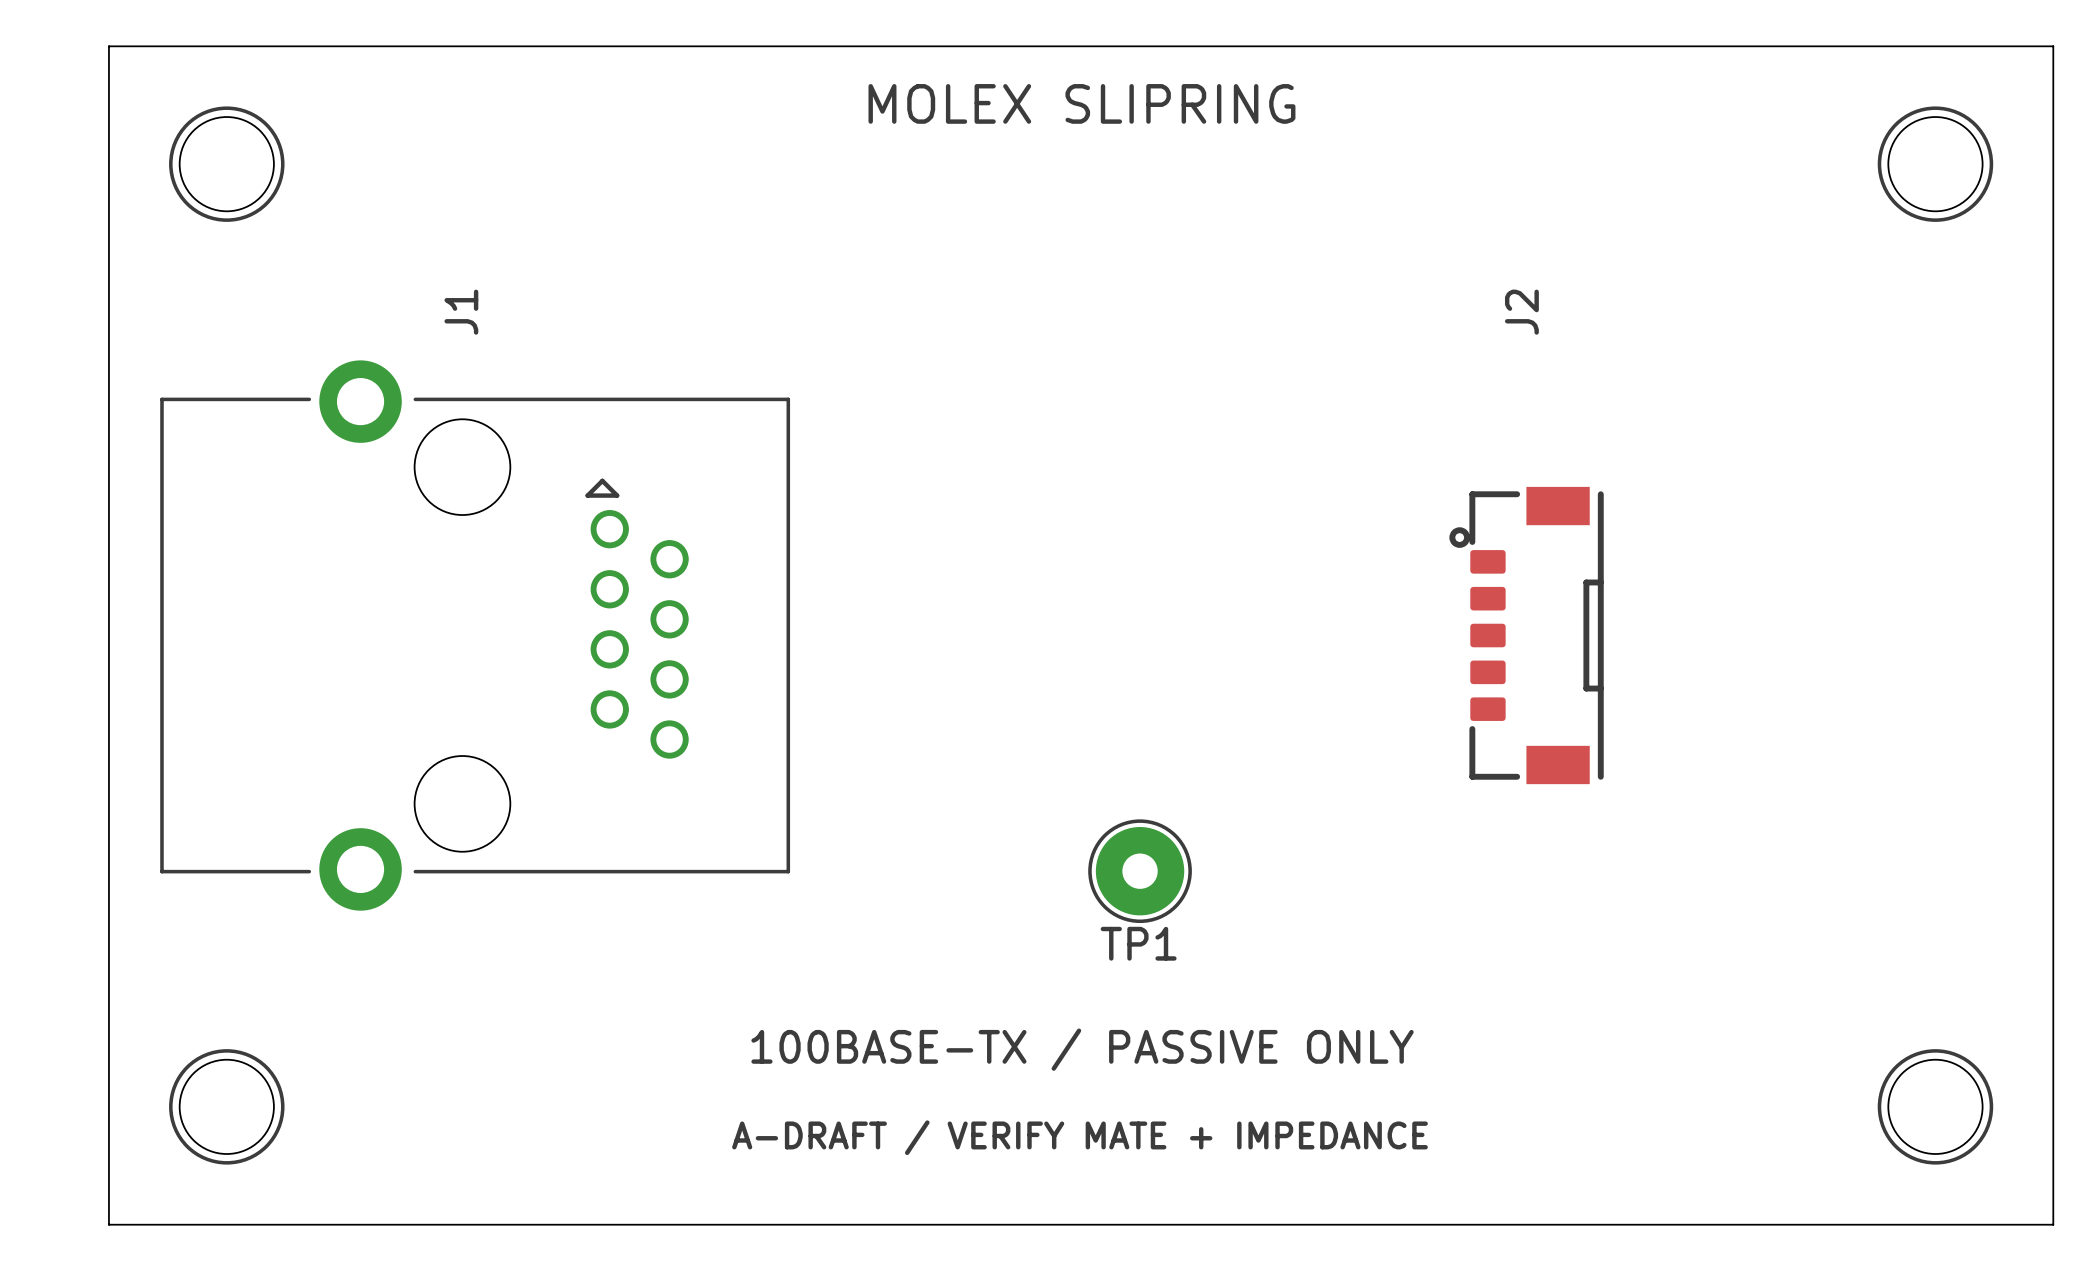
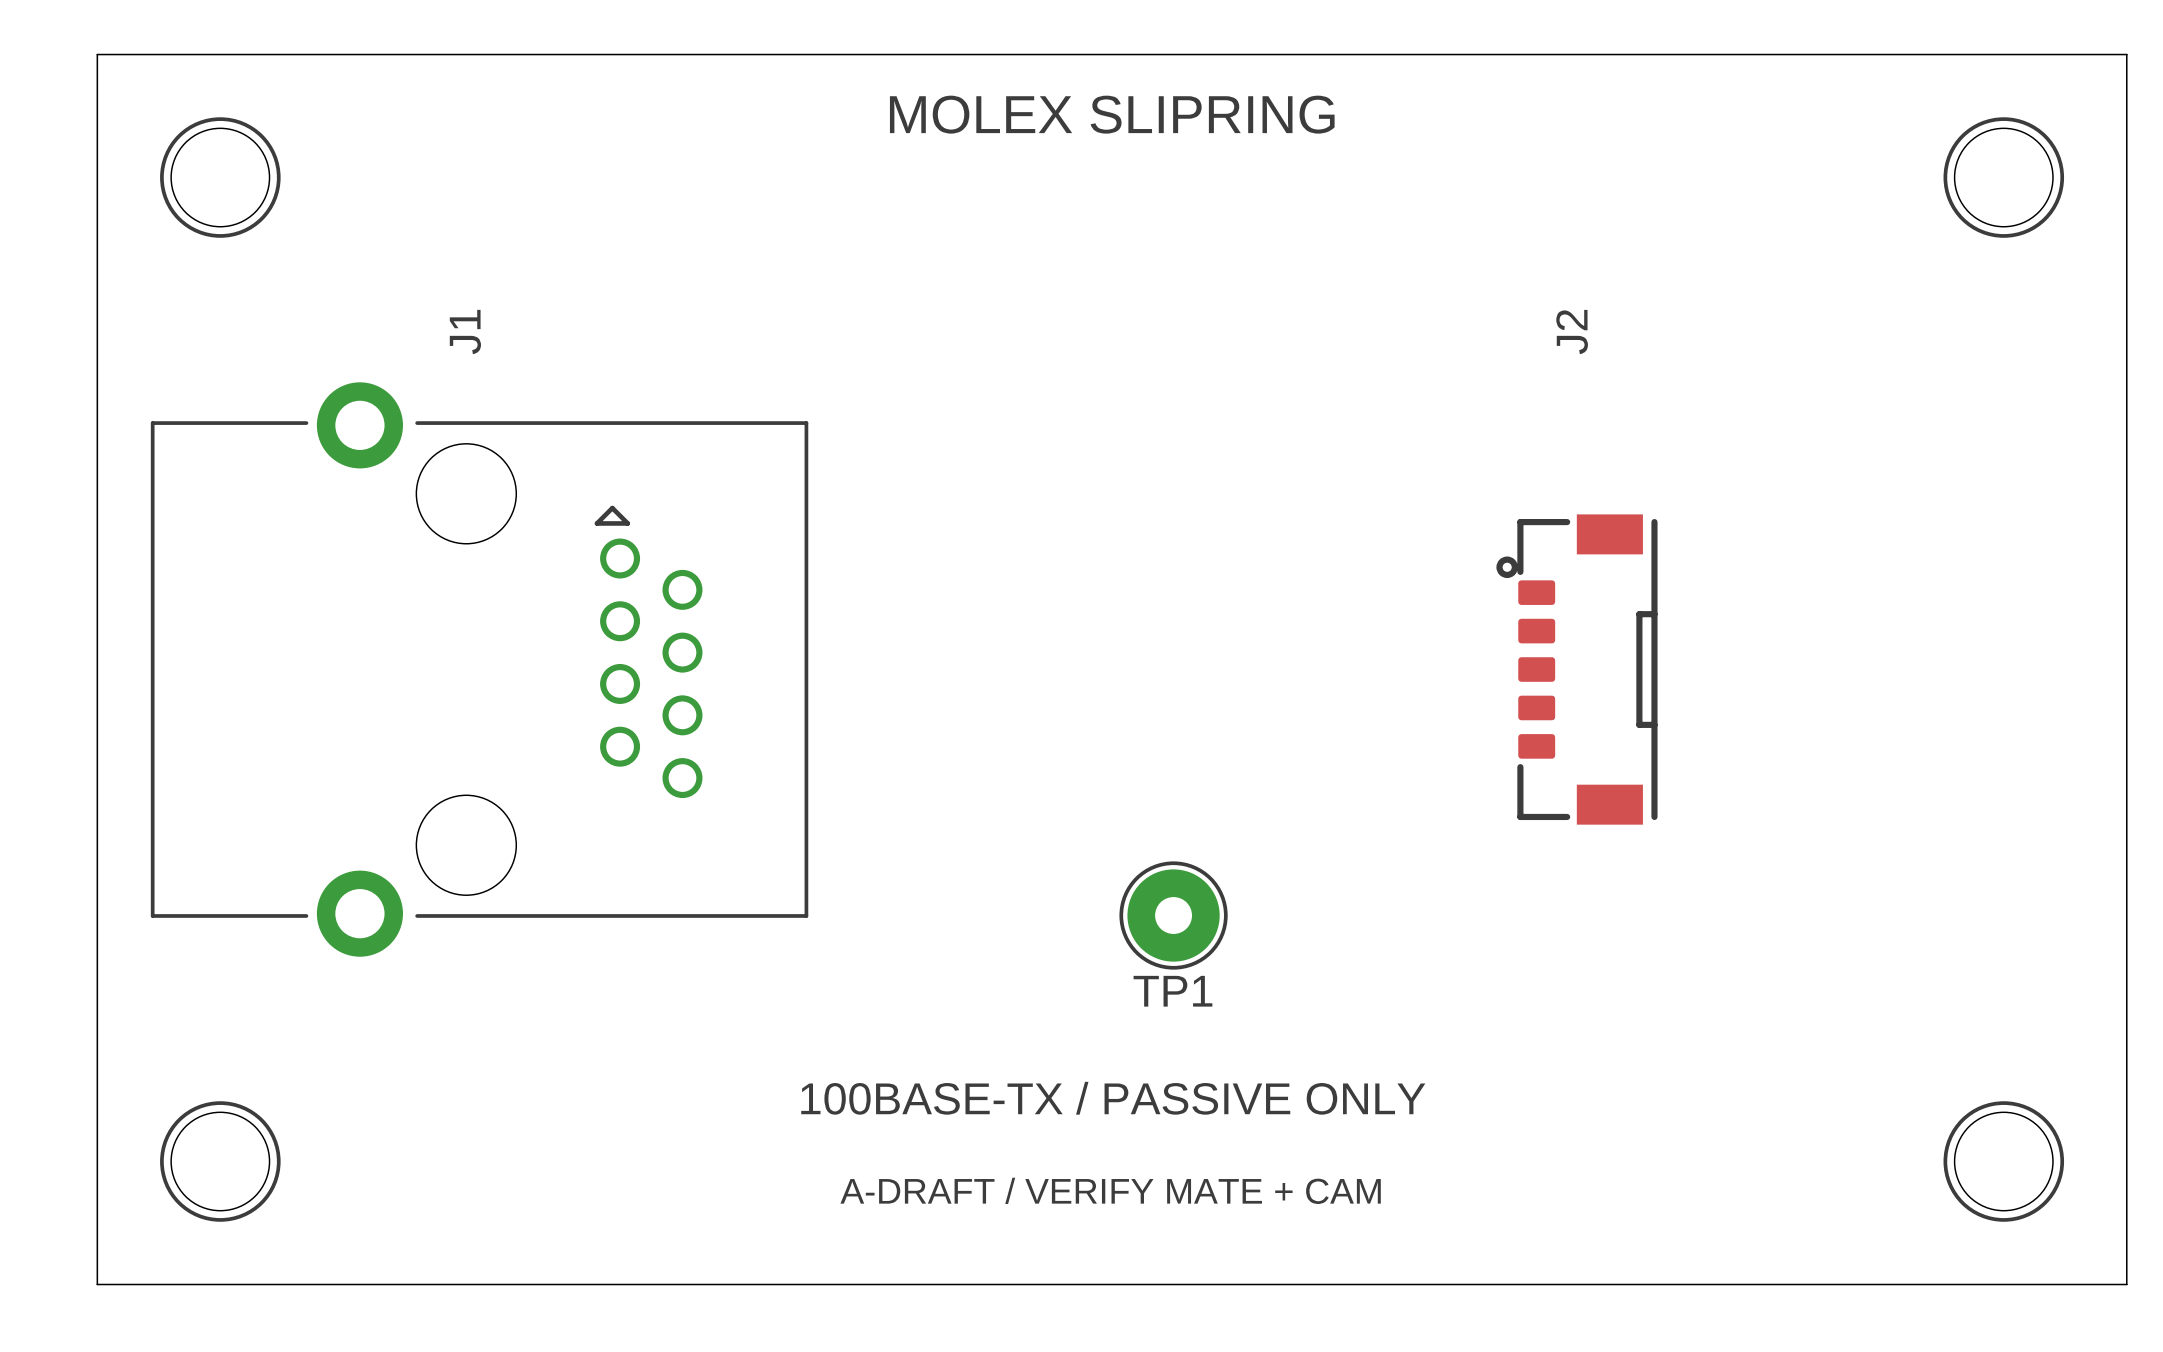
text: A-DRAFT / VERIFY MATE + IMPEDANCE (1080, 1137) -> A-DRAFT / VERIFY MATE + CAM (1110, 1190)

